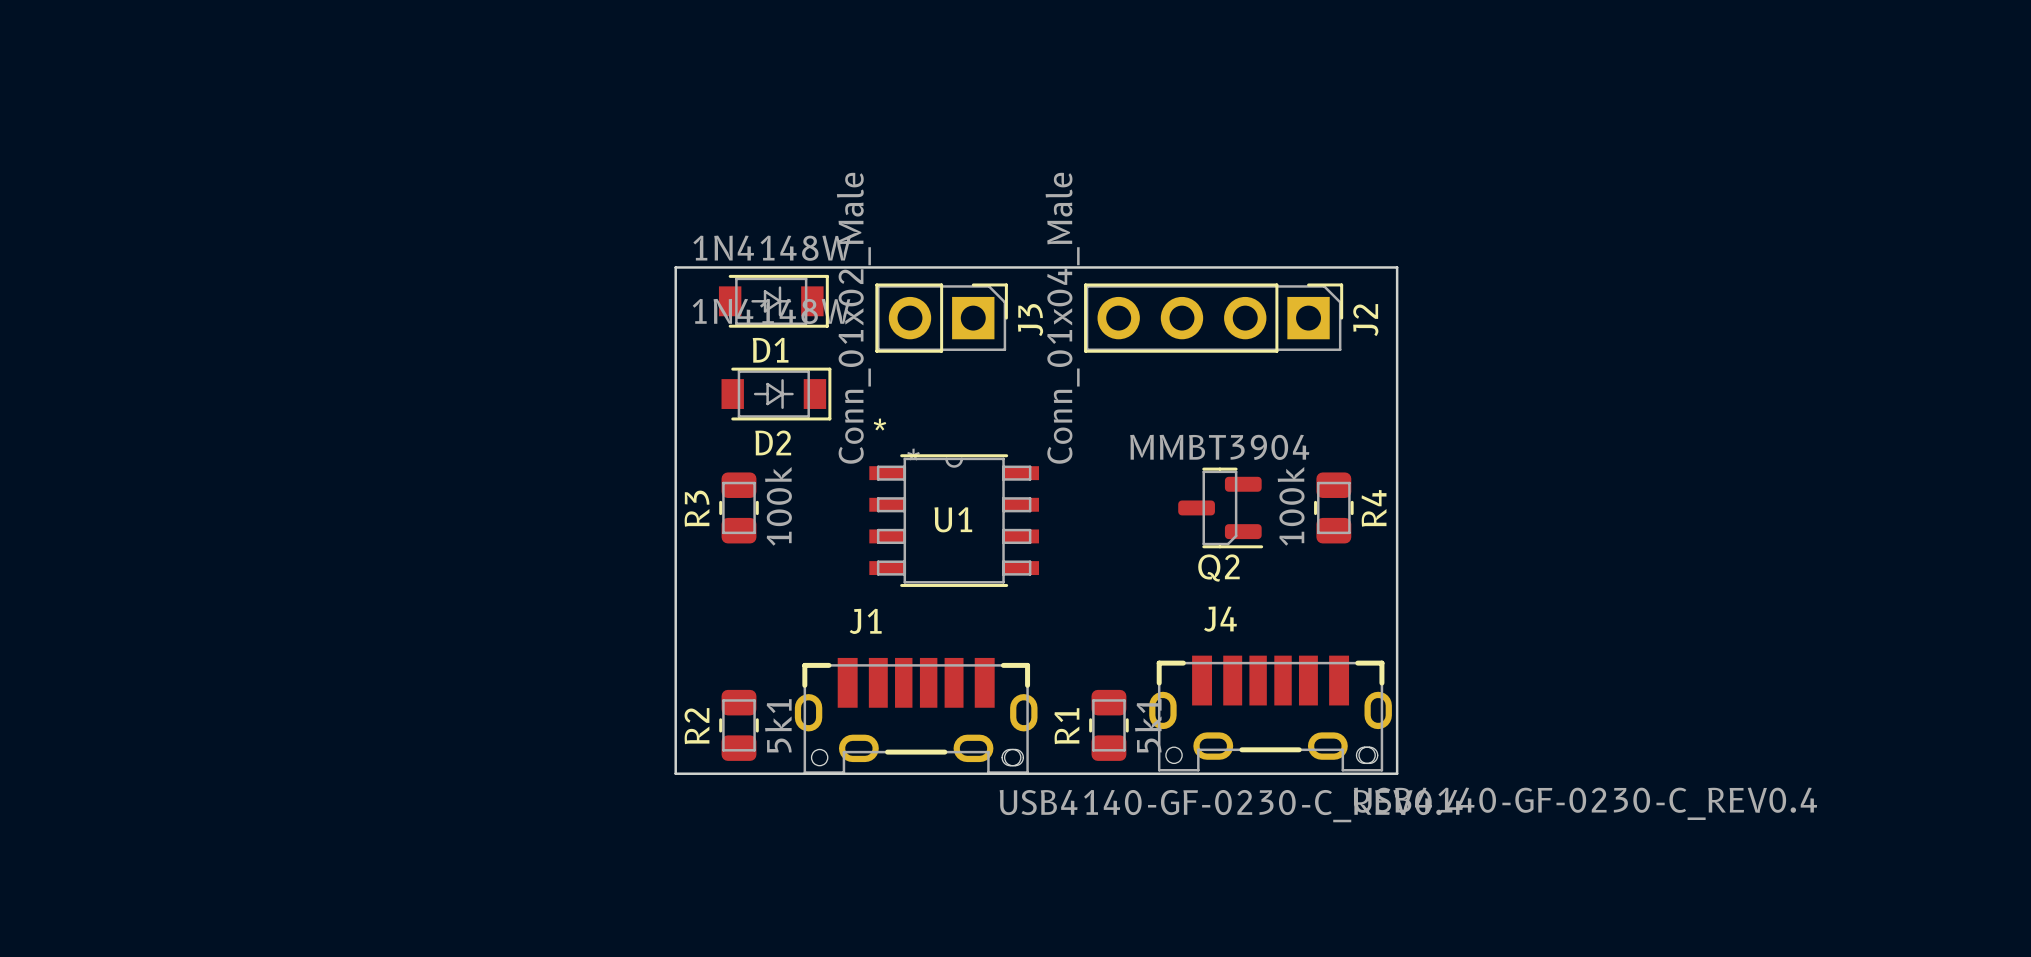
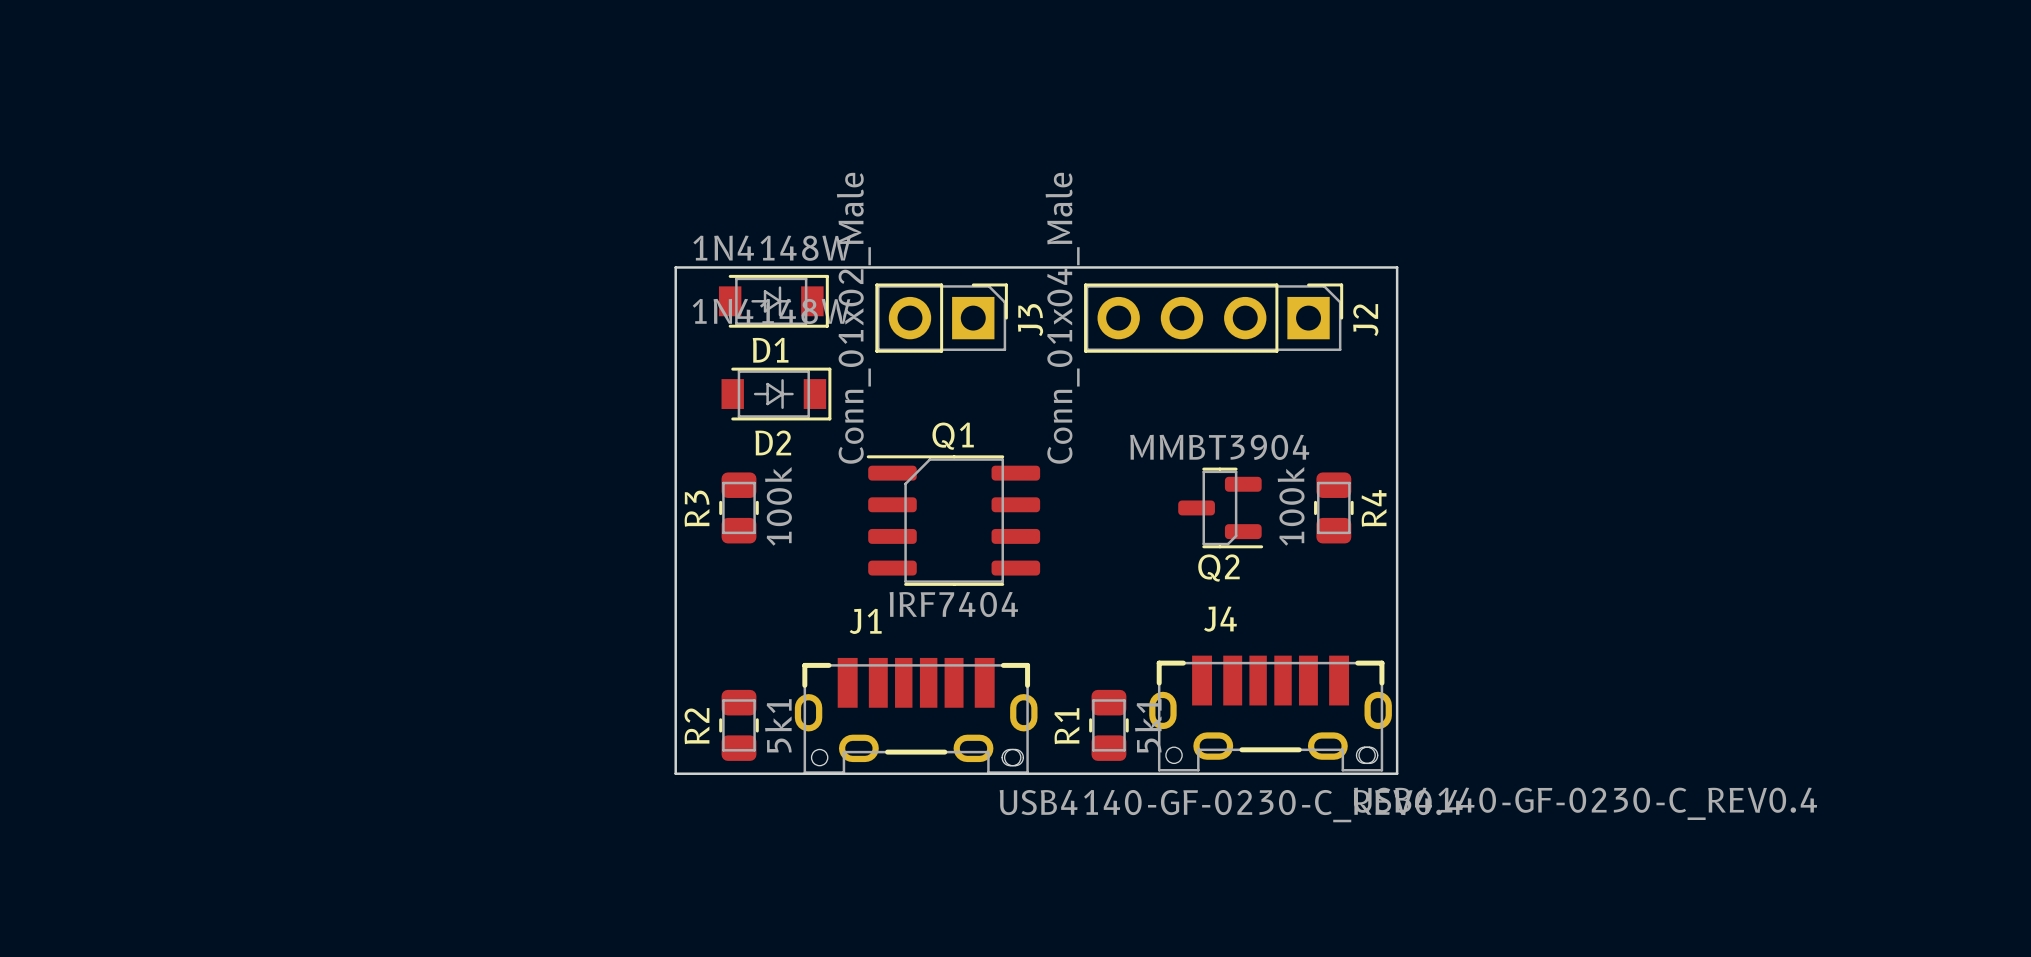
Q1: none -> IRF7404 (953, 520)
U1: (954, 520) -> none

